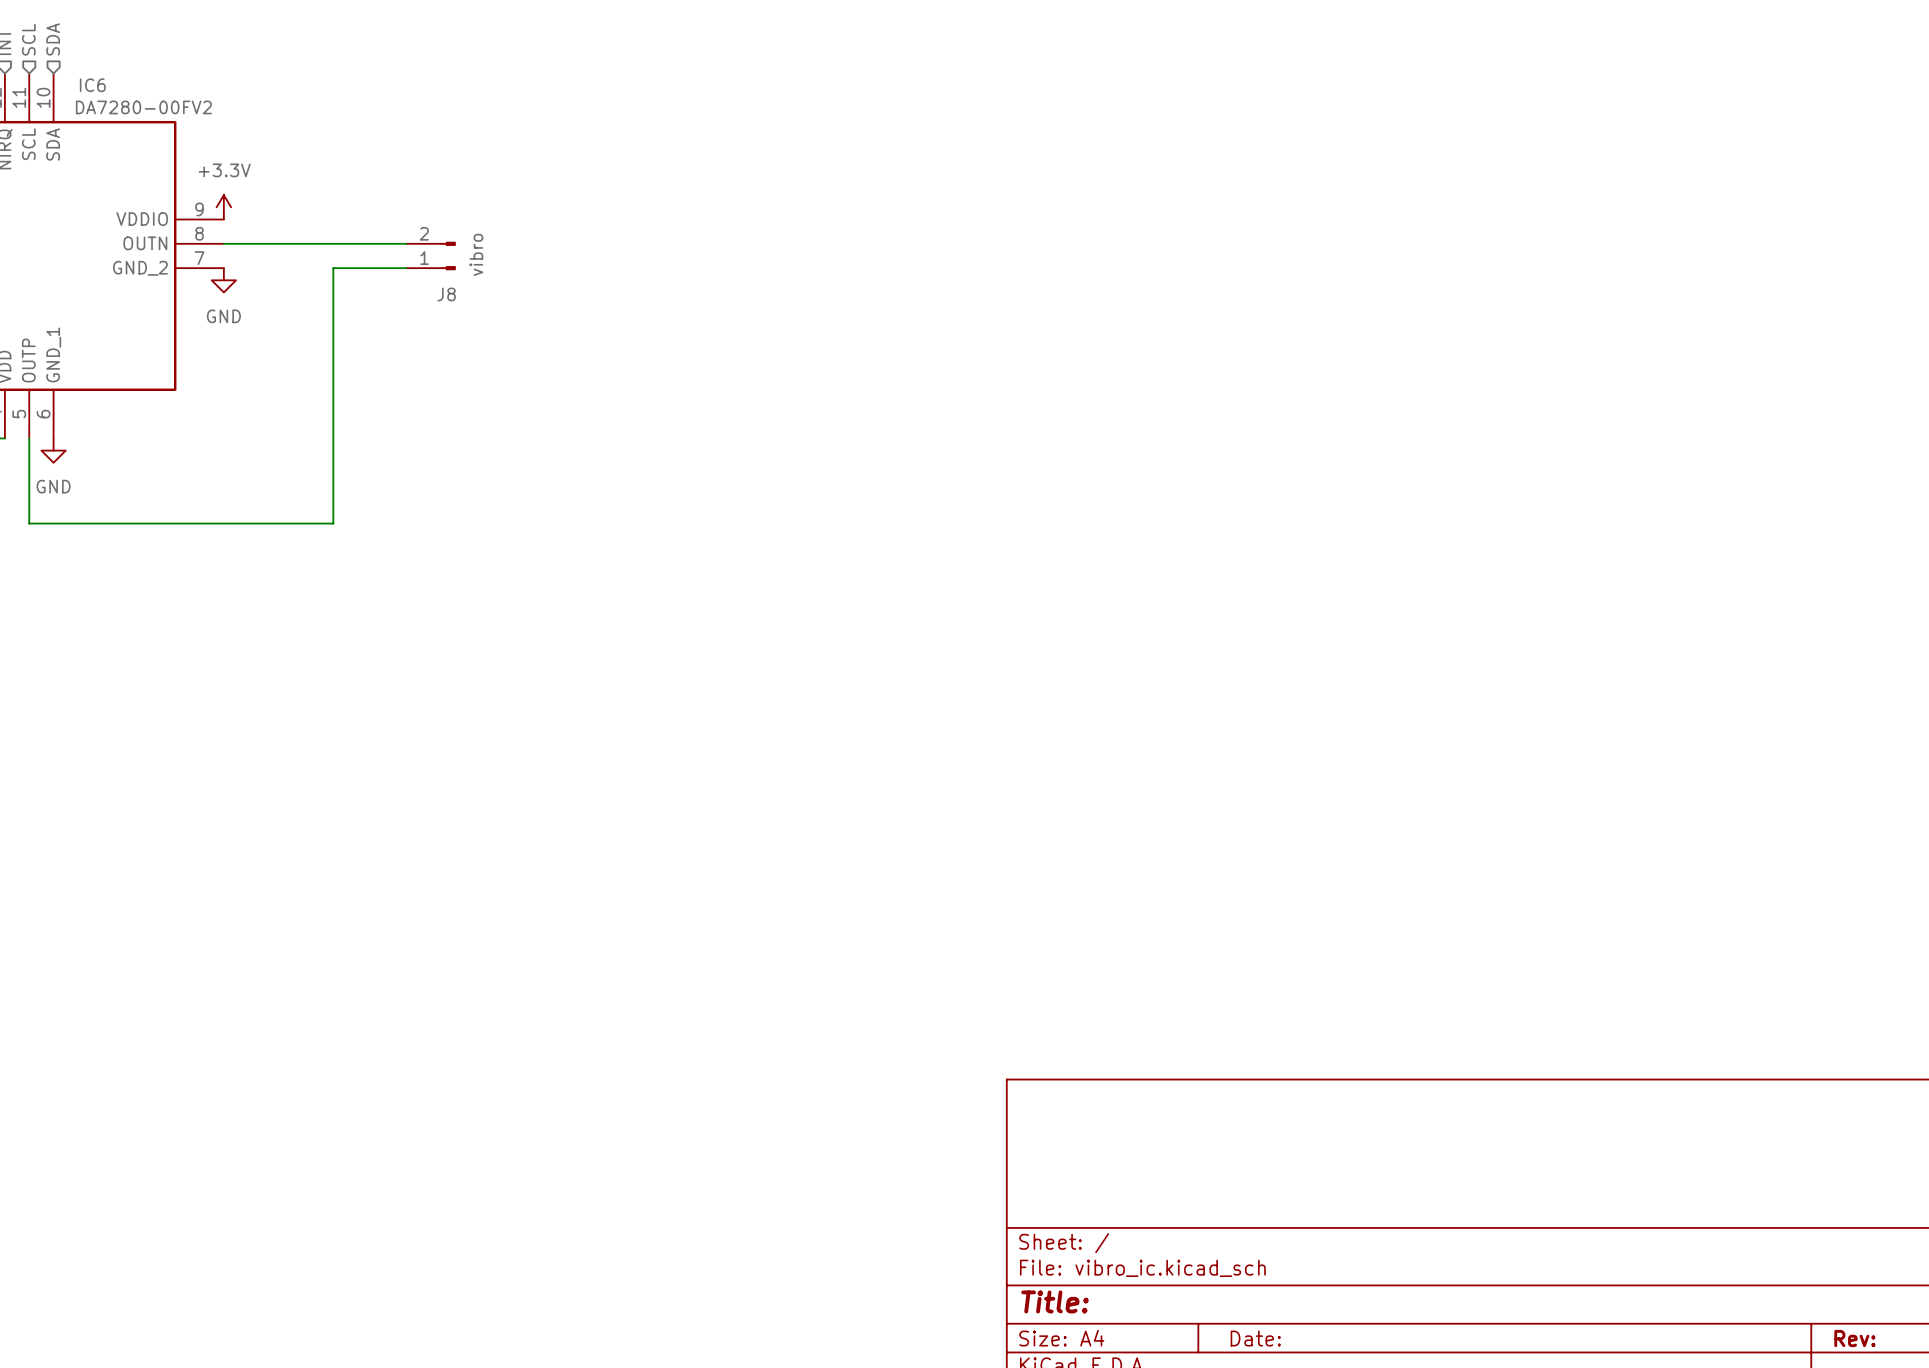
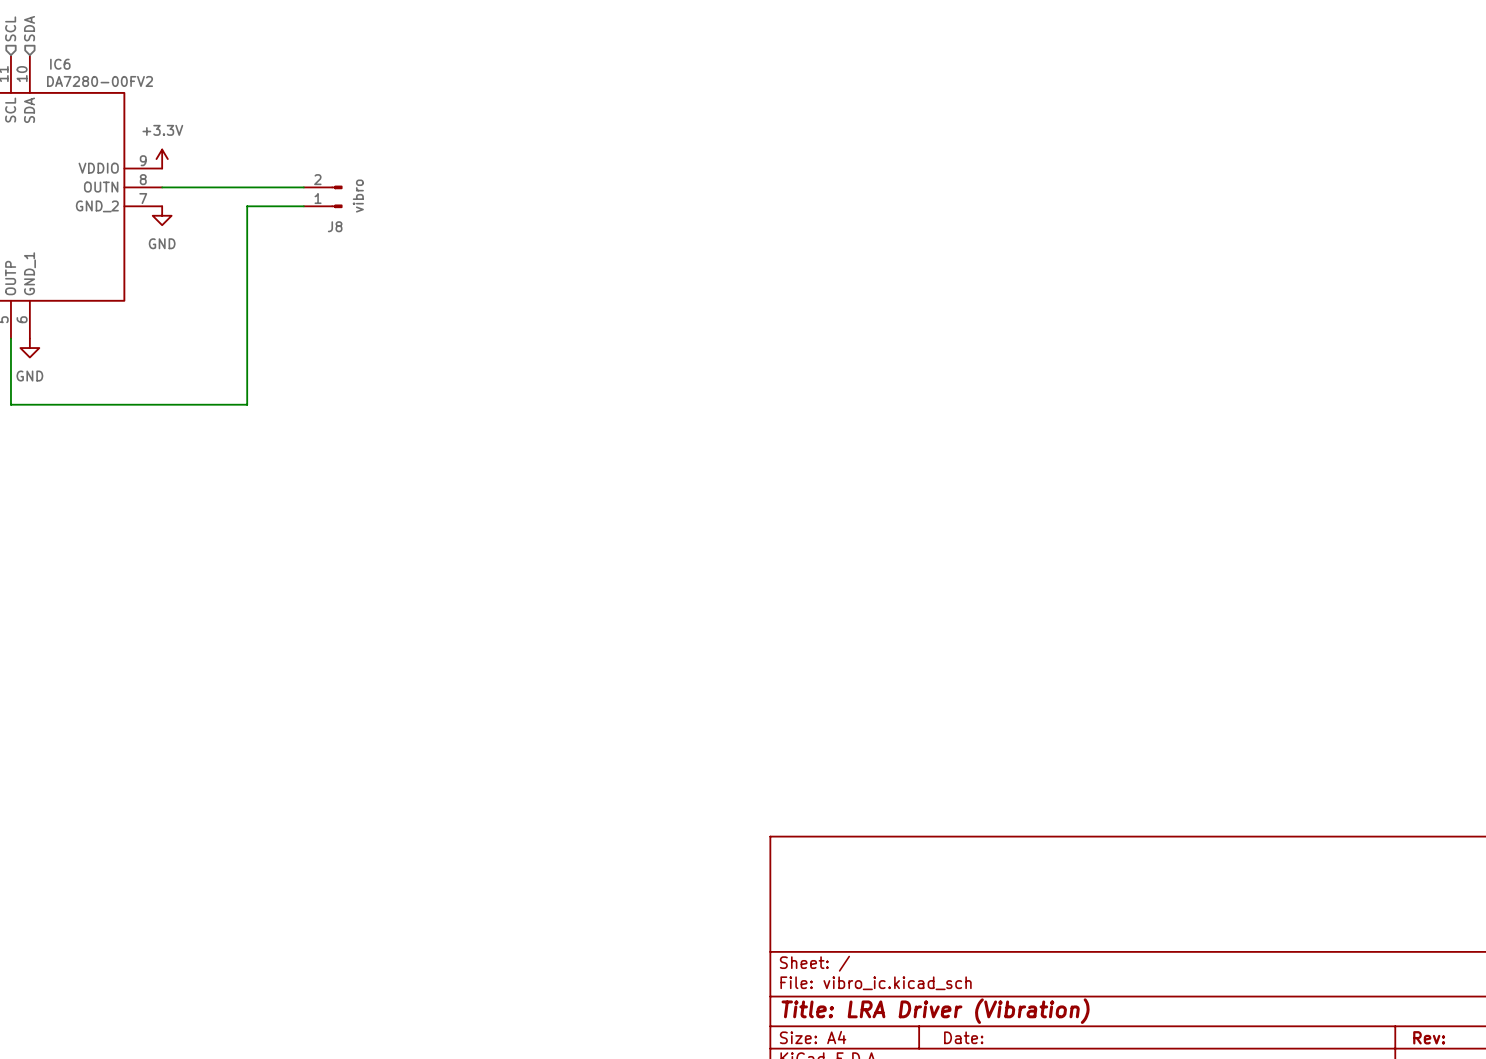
title block: Title: (1054, 1301) -> Title: LRA Driver (Vibration) (935, 1011)

